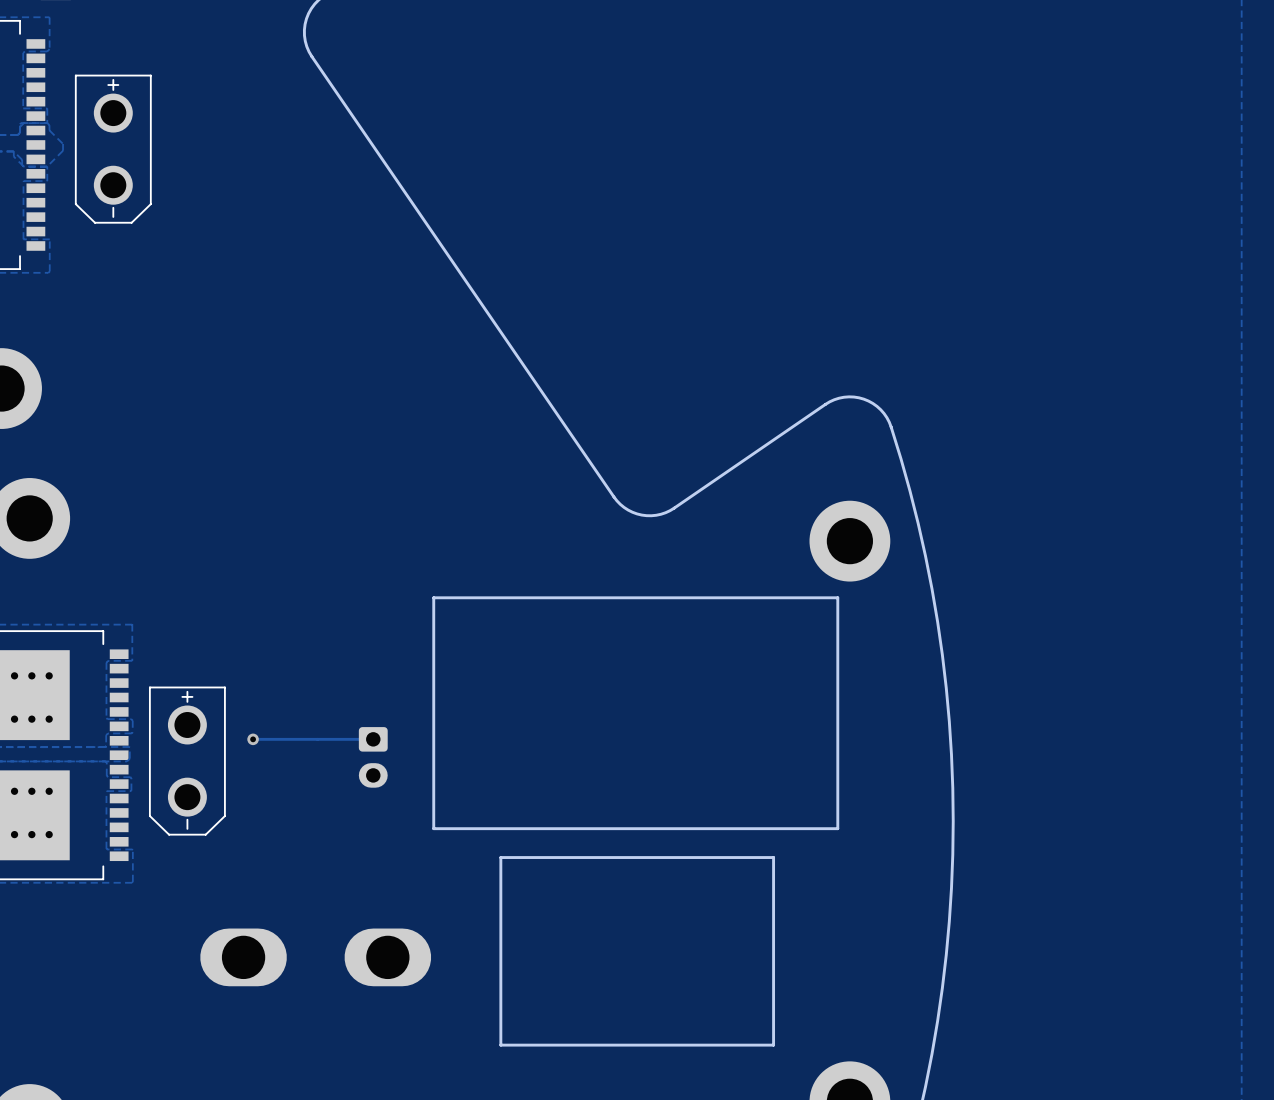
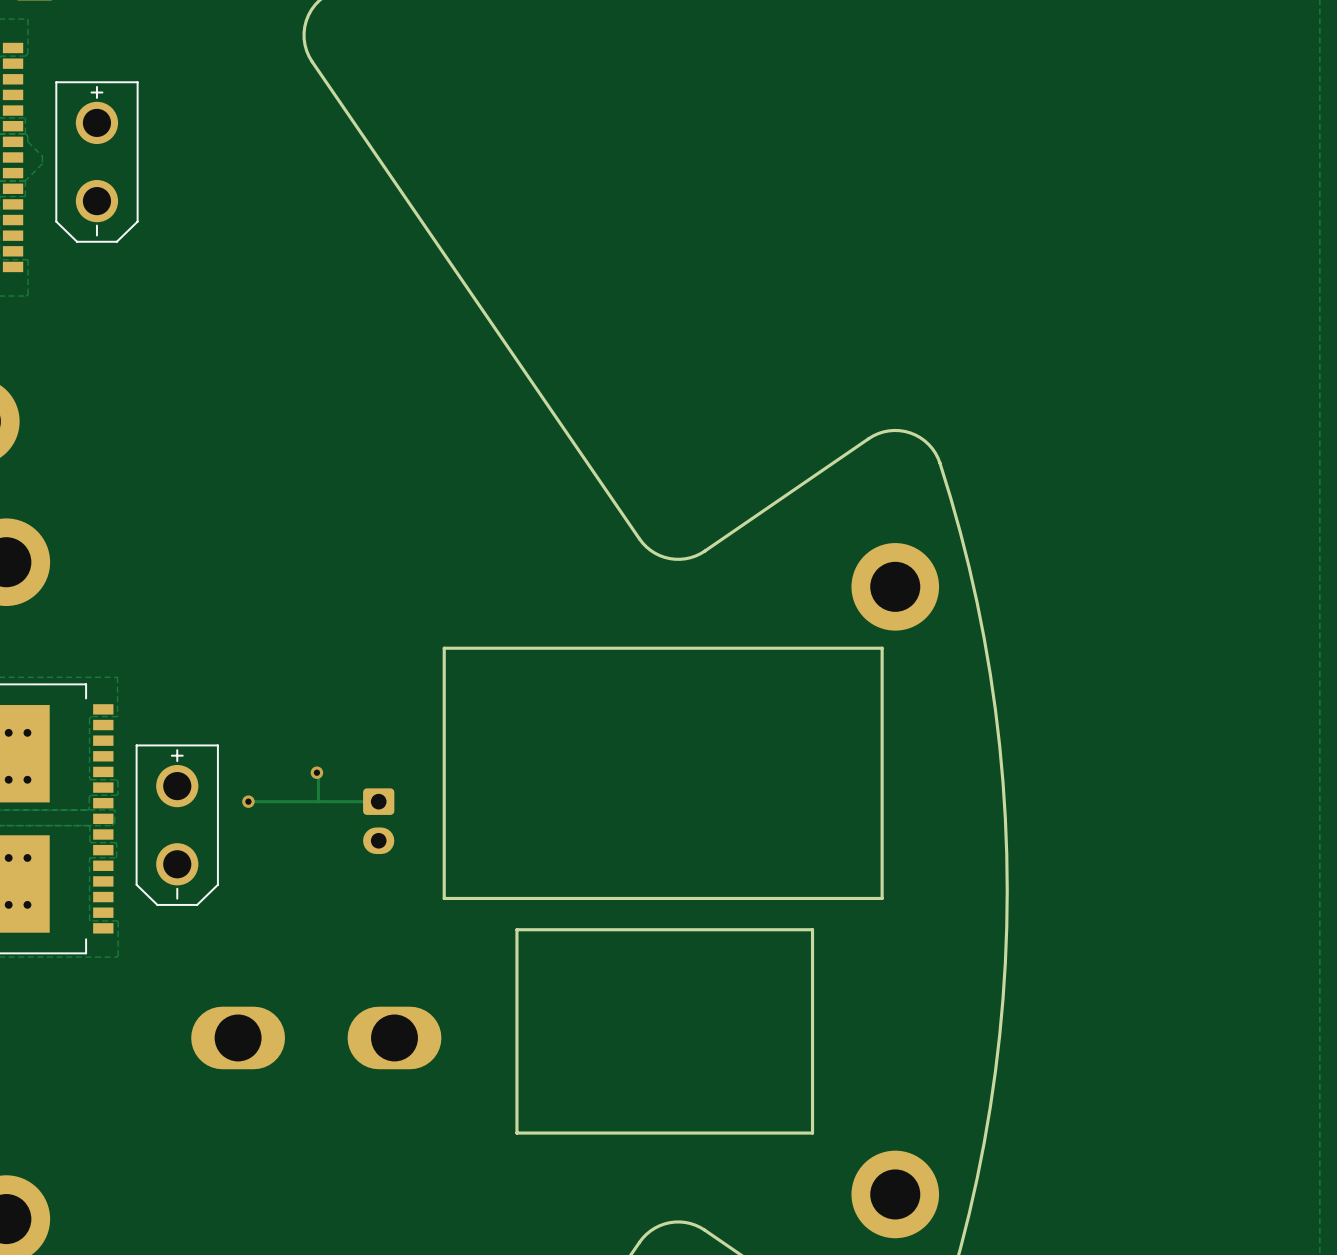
track: none -> (316, 772) (318, 801)
via: none -> (316, 772)

